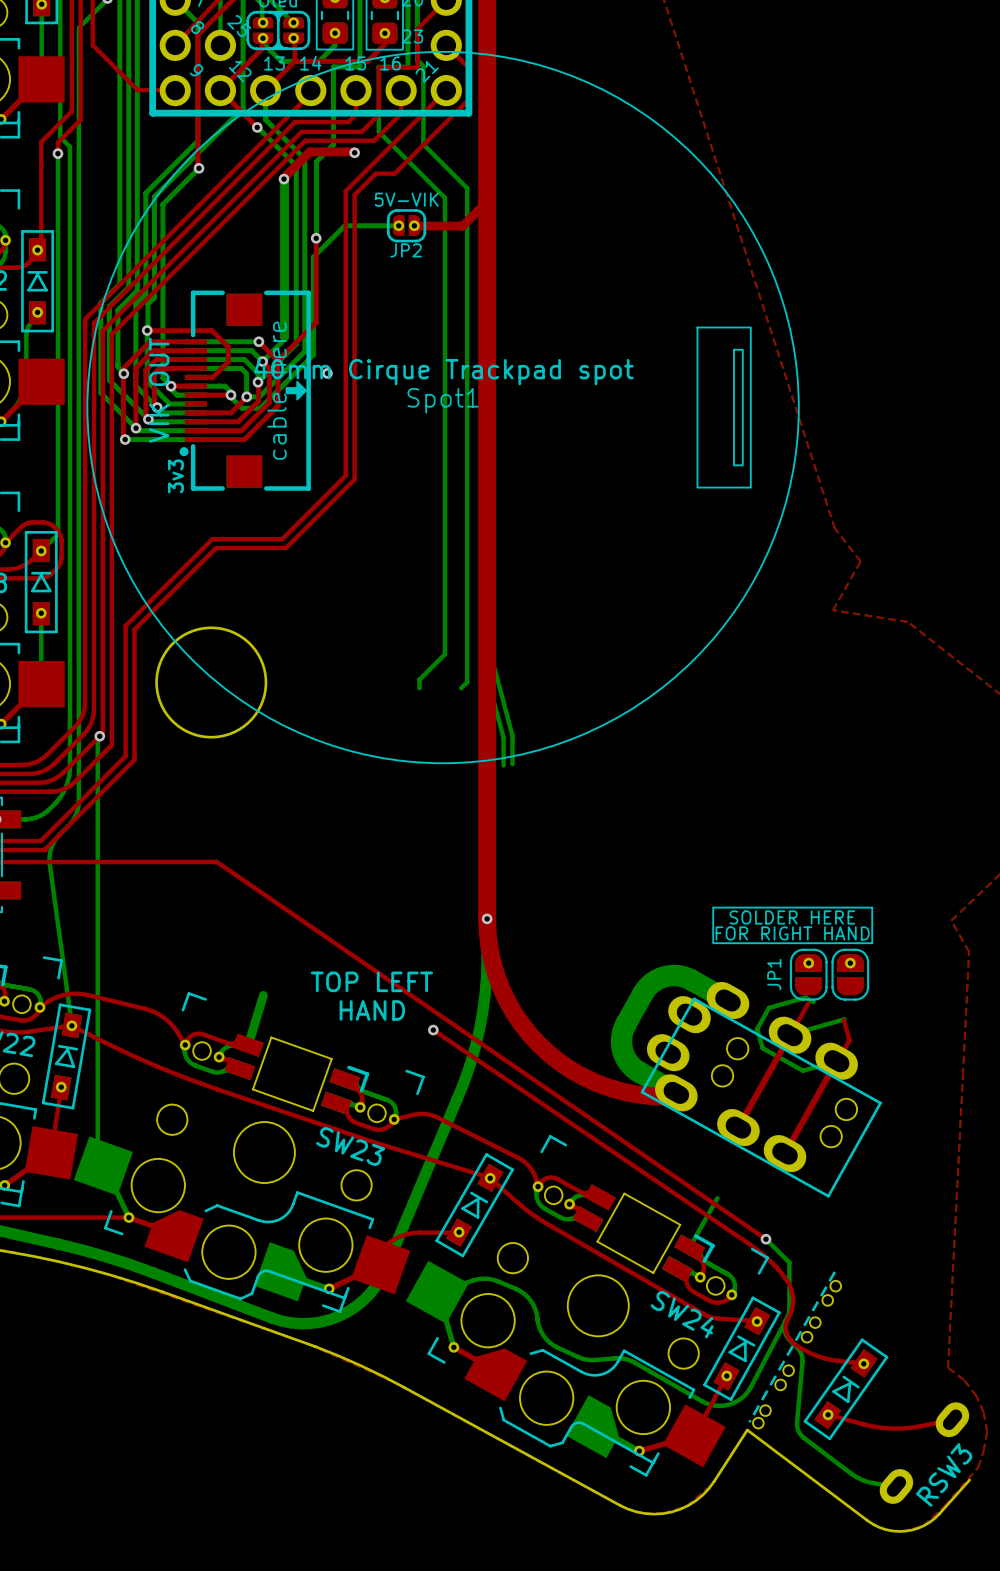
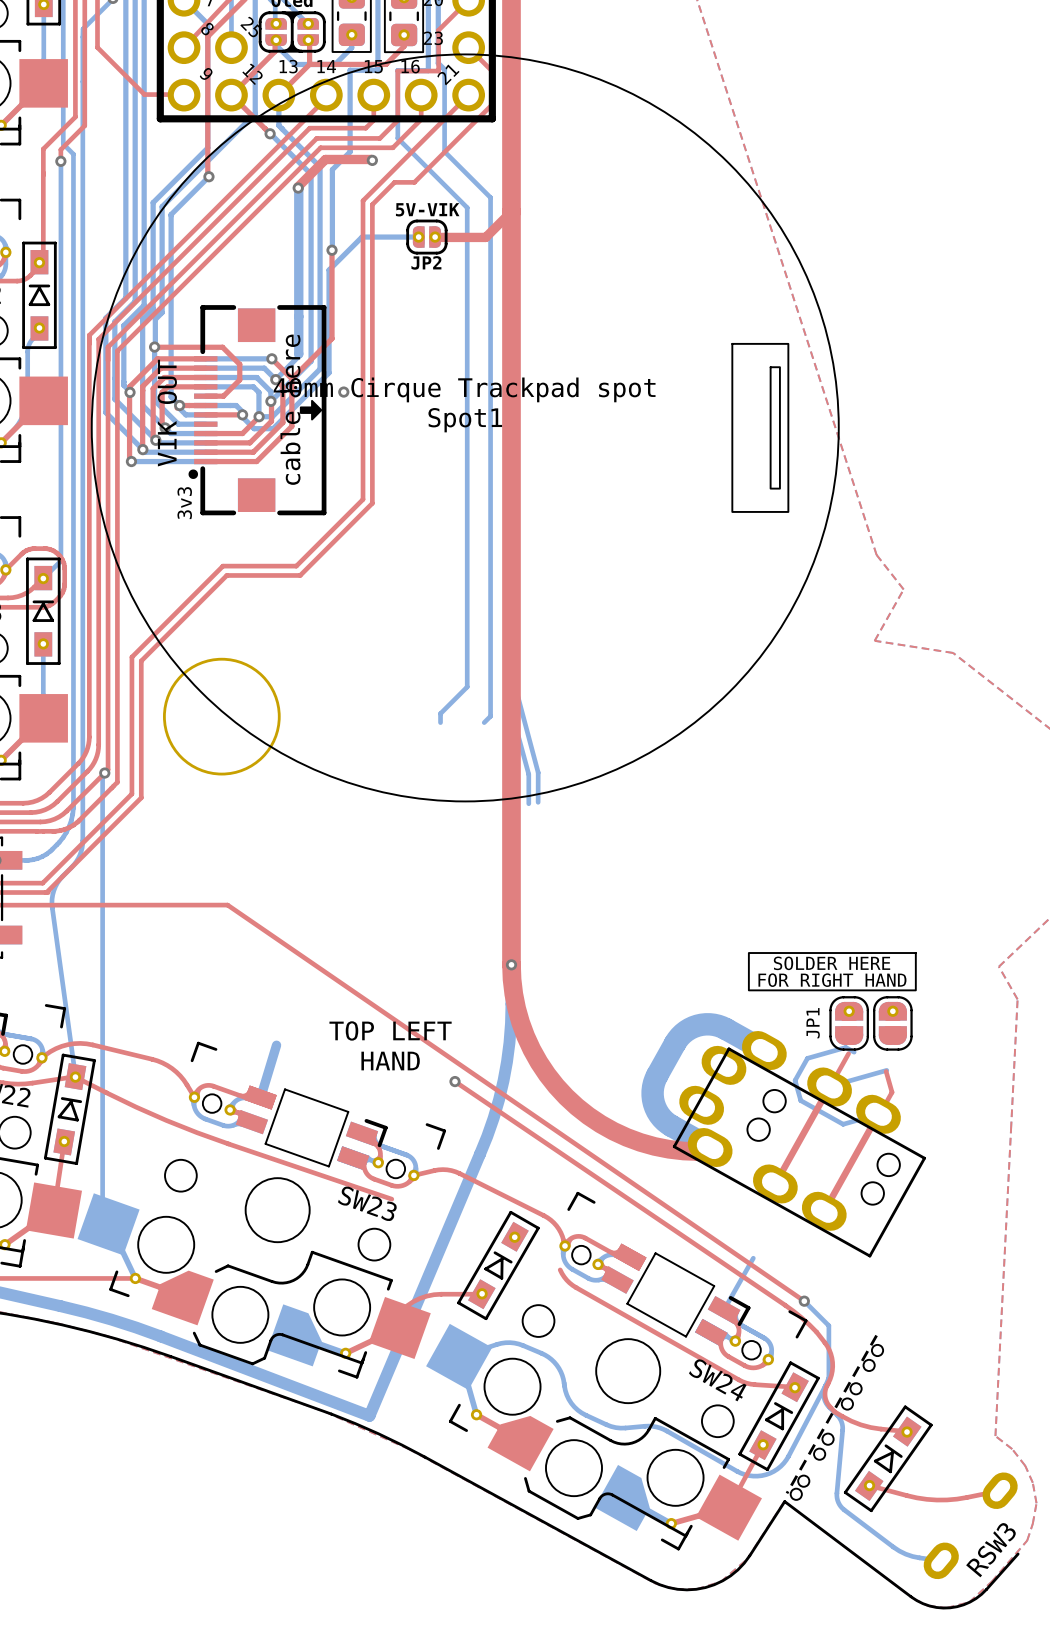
top track: (373, 1142) (490, 1177) -> none
top track: (490, 1178) (539, 1219) (703, 1314) -> (560, 1269) (566, 1280) (576, 1287) (738, 1379)
bottom track: (385, 1269) (369, 1293) (355, 1307) (338, 1316) (310, 1323) (290, 1322) (271, 1317) -> (404, 1332) (369, 1415) (285, 1383)

